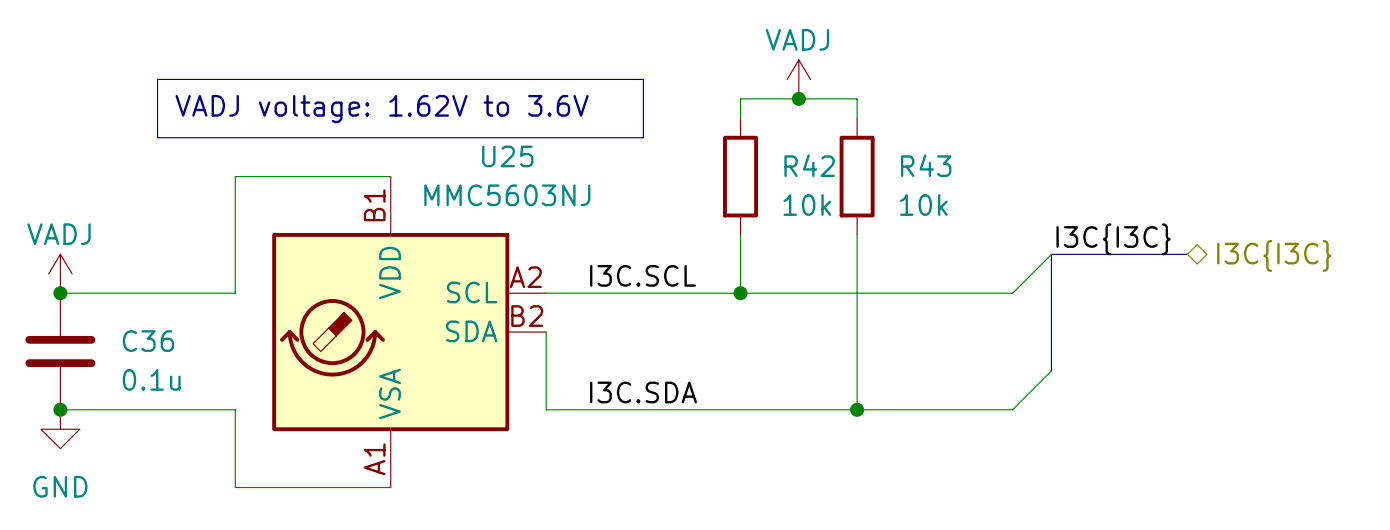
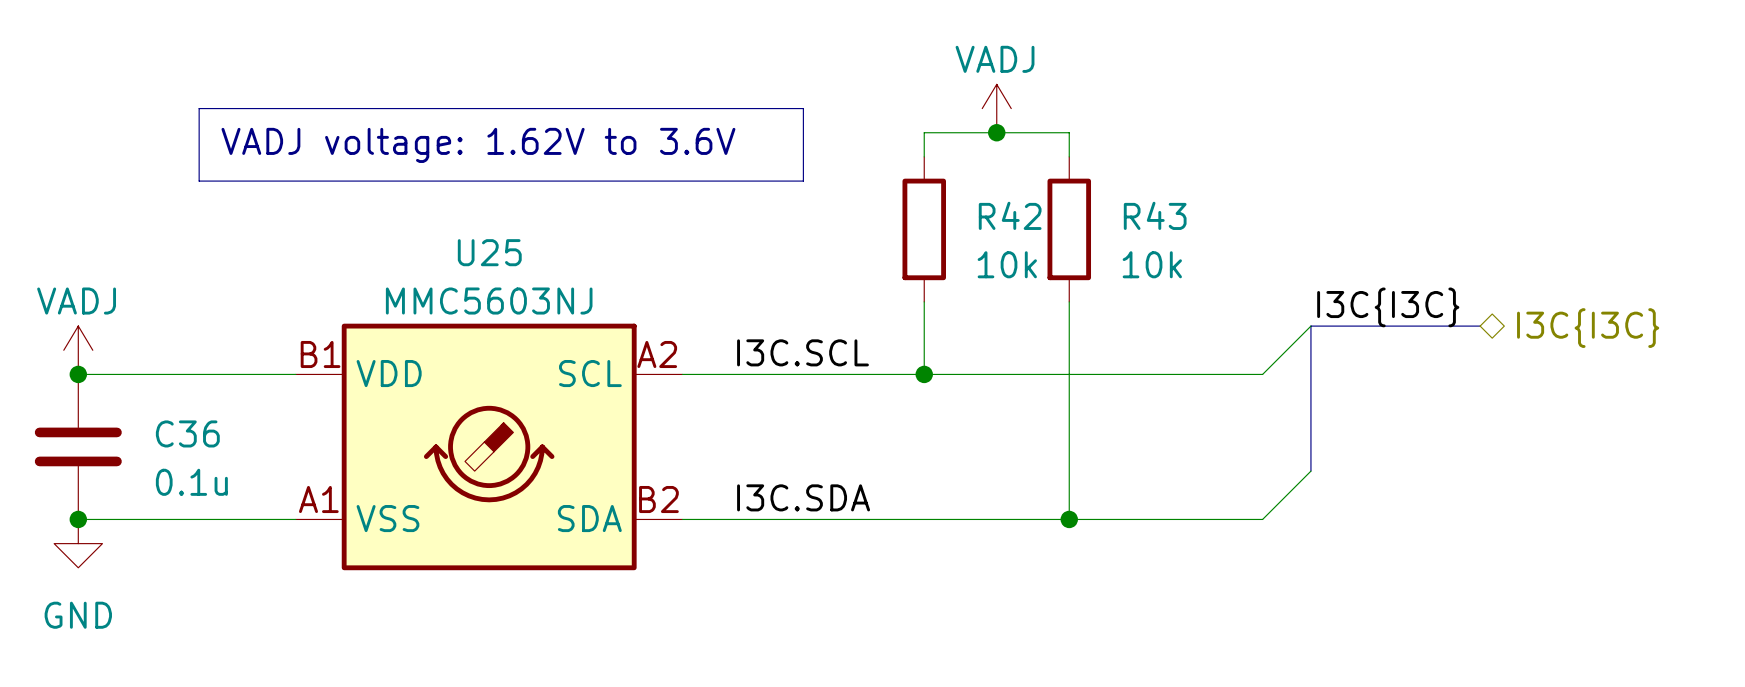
U25 name position: U25 (507, 156) -> U25 (489, 252)
U25 symbol: [272, 176, 547, 488] -> [295, 323, 683, 571]
wire: (390, 176) (235, 176) (235, 293) -> none
U25 value position: MMC5603NJ (507, 195) -> MMC5603NJ (489, 301)
wire: (546, 332) (546, 409) -> none
wire: (235, 409) (235, 487) (390, 487) -> none

